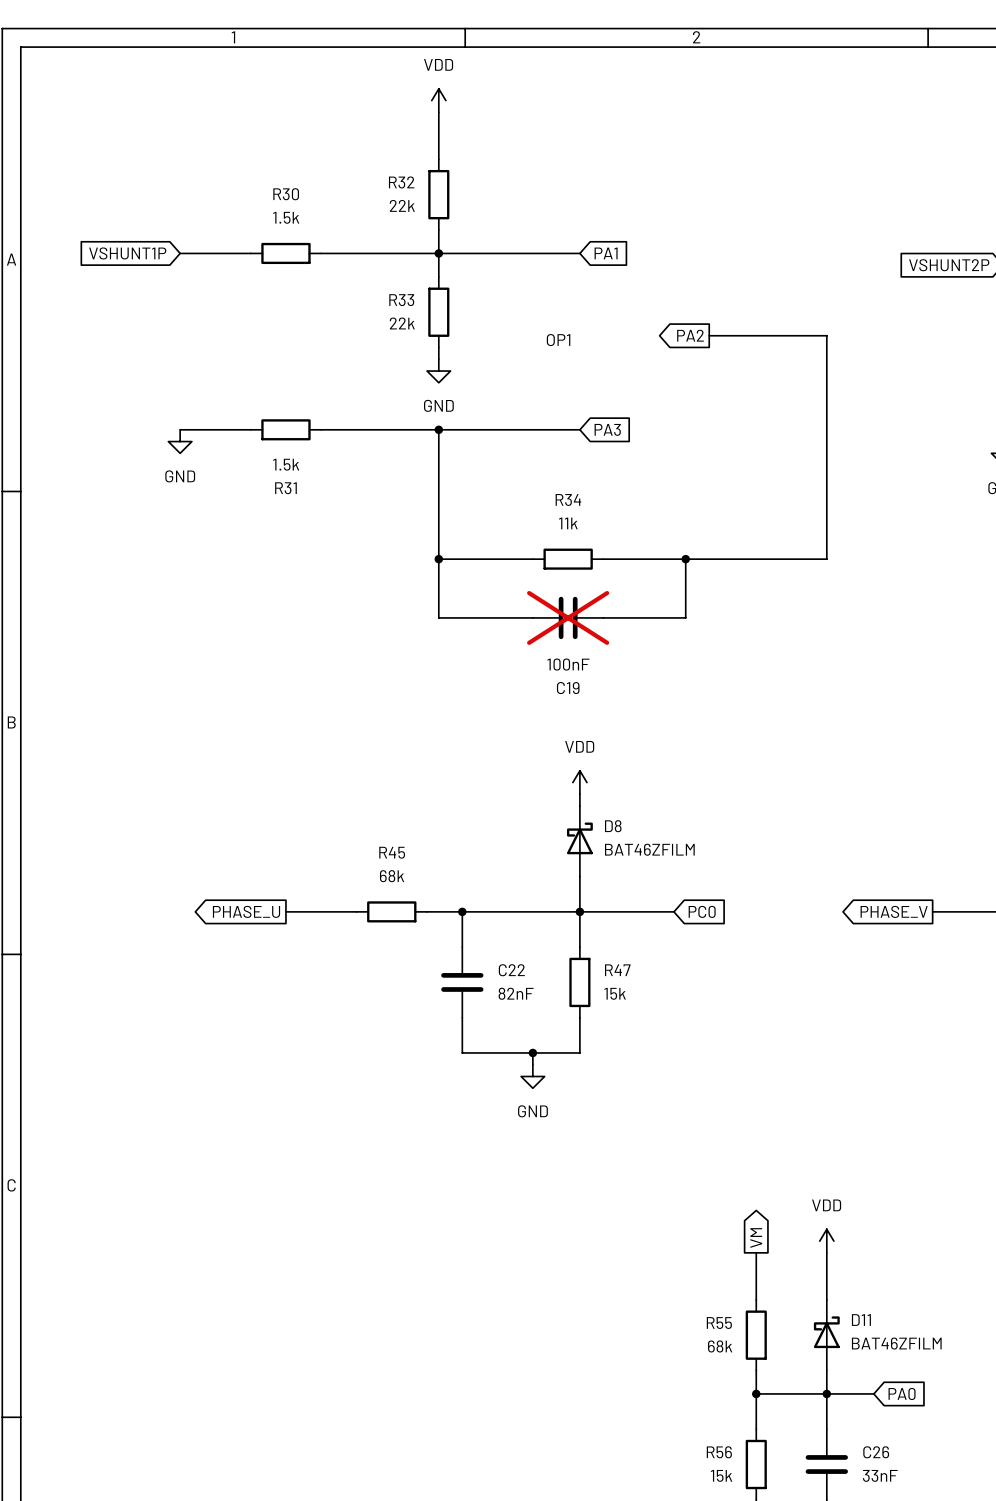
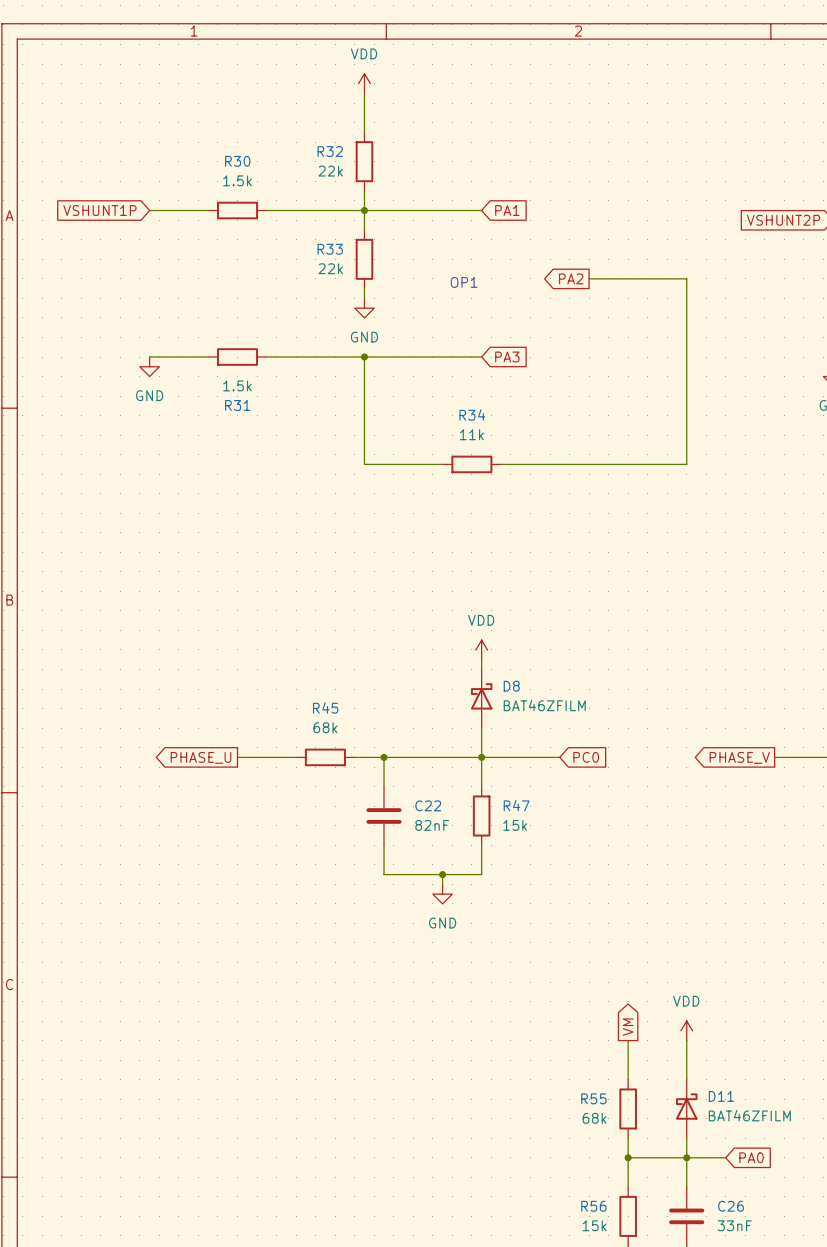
wire: (438, 559) (438, 617) (532, 617) -> none
junction: (438, 559) -> none
wire: (685, 559) (685, 617) (603, 617) -> none
junction: (685, 559) -> none
C19: 100nF (568, 617) -> none

